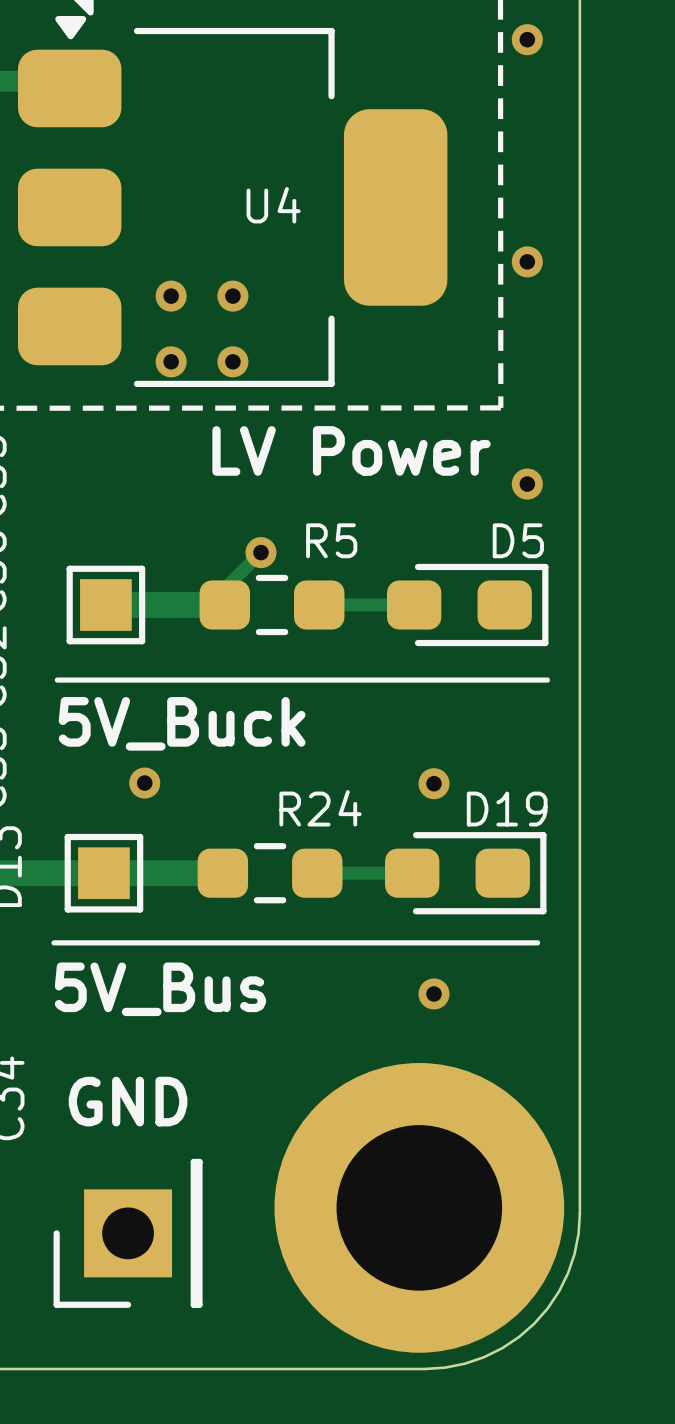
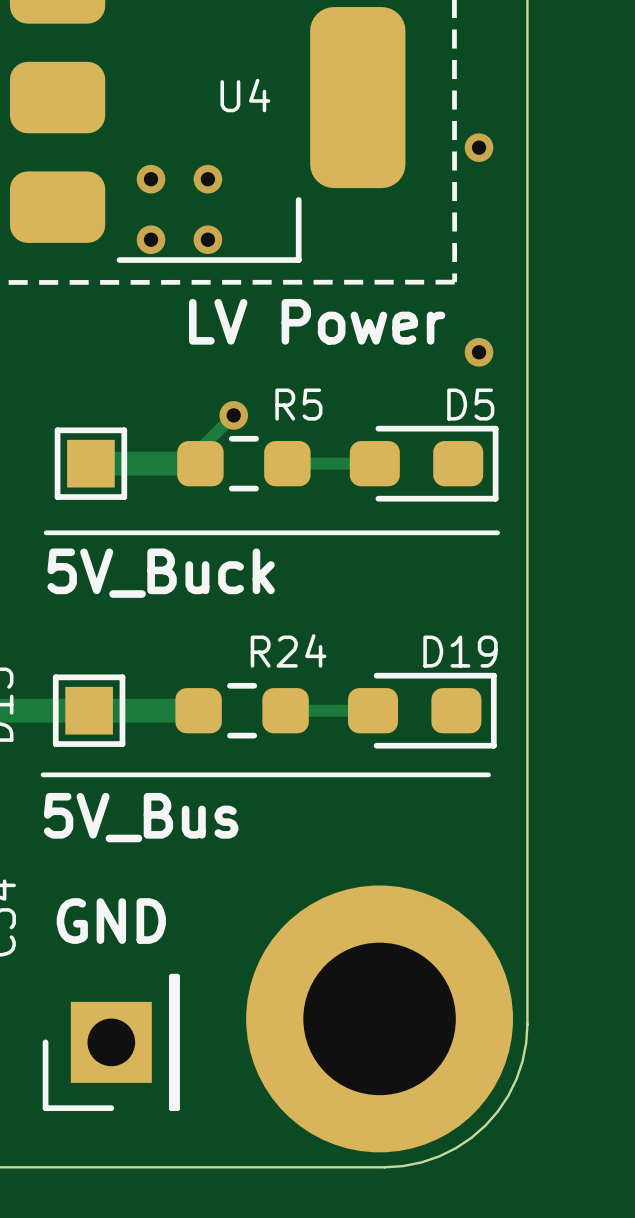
via: (144, 783) -> none
via: (434, 783) -> none
via: (434, 993) -> none

